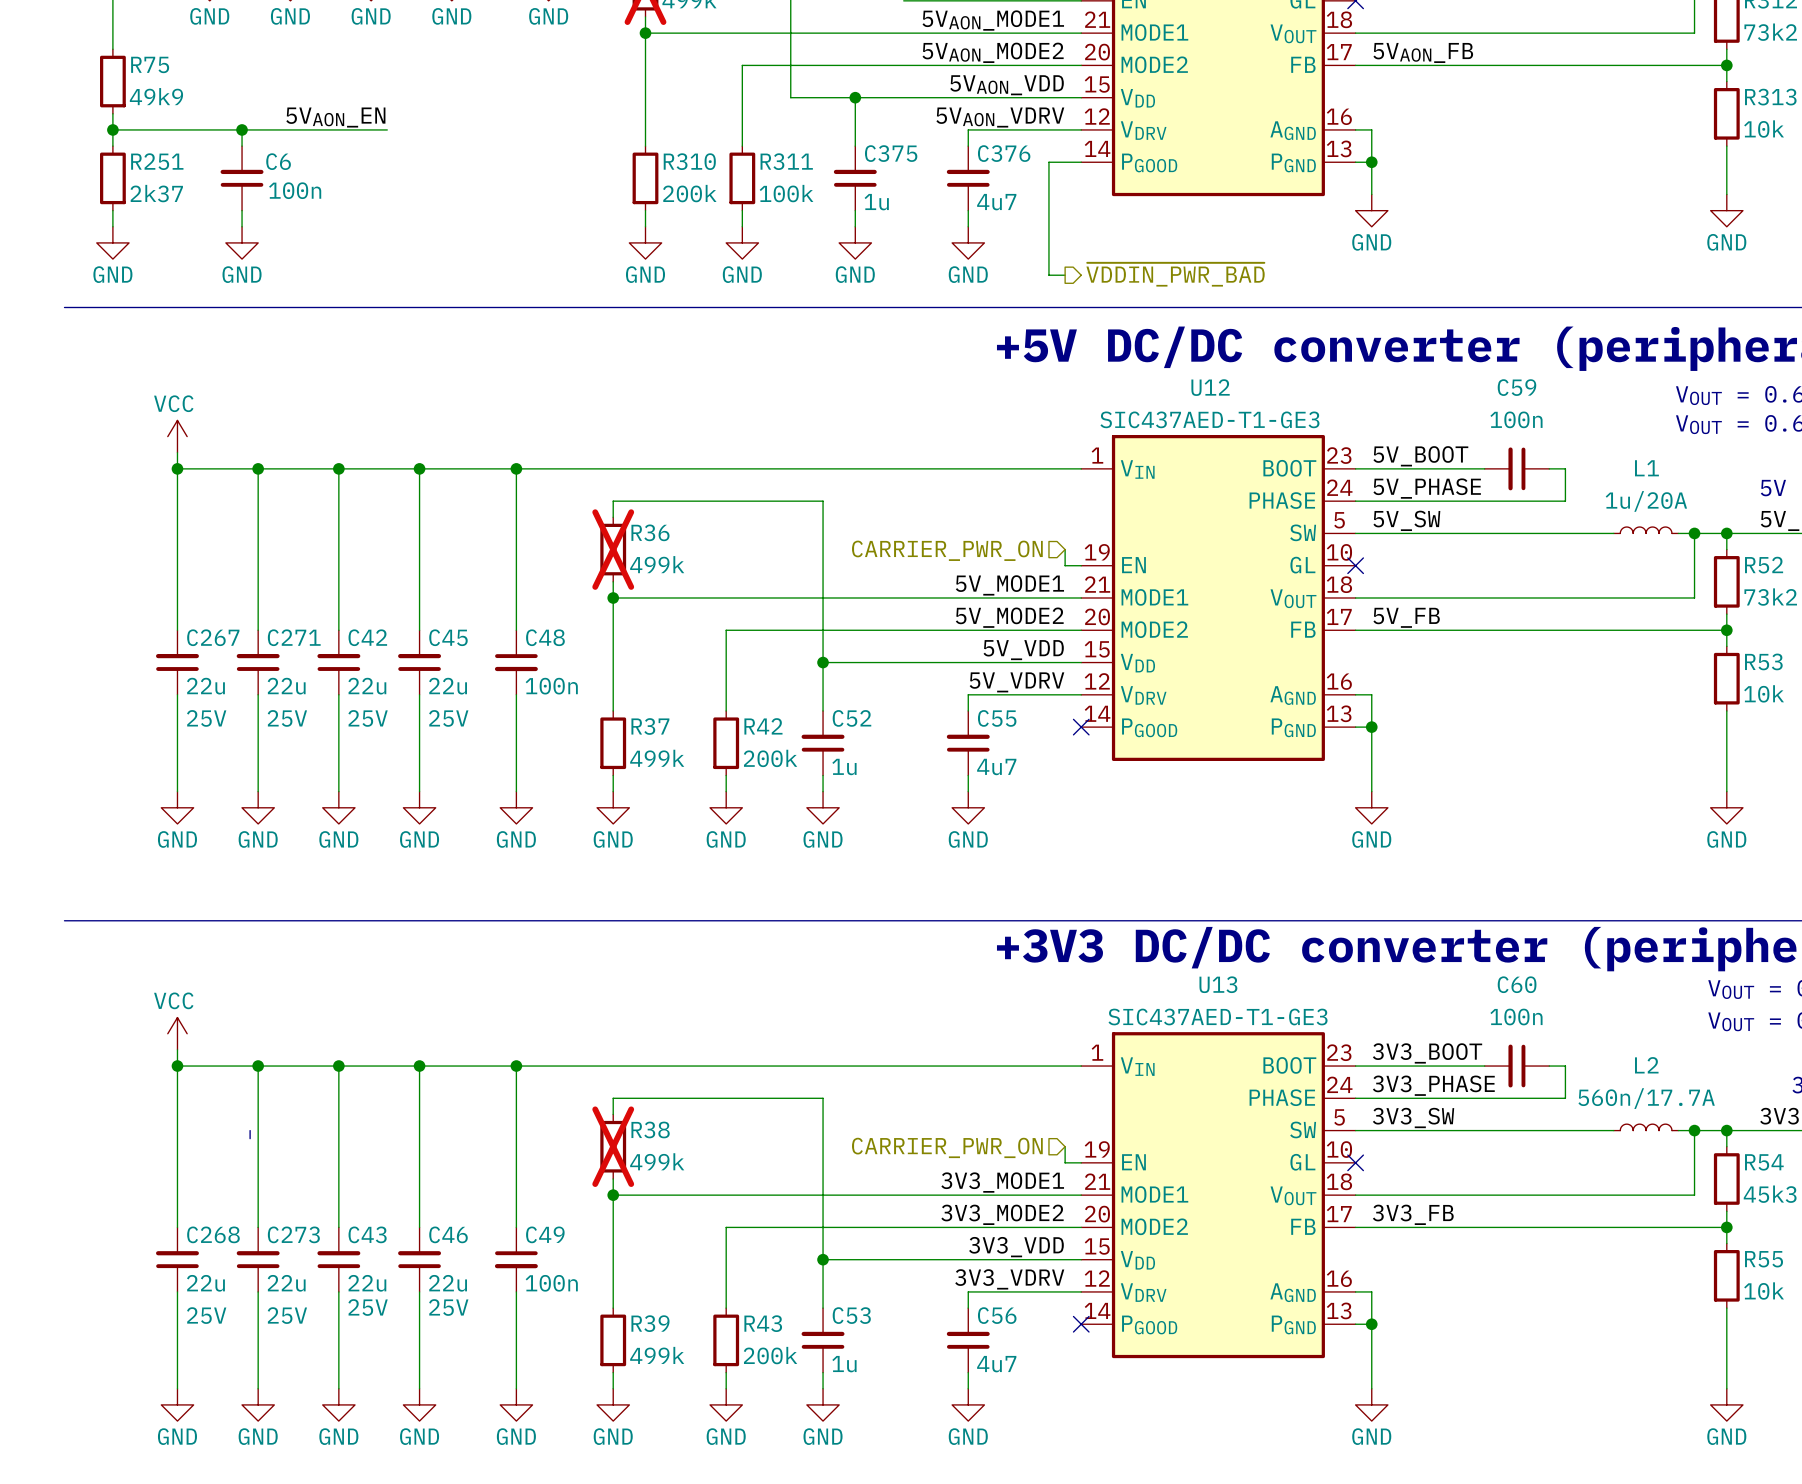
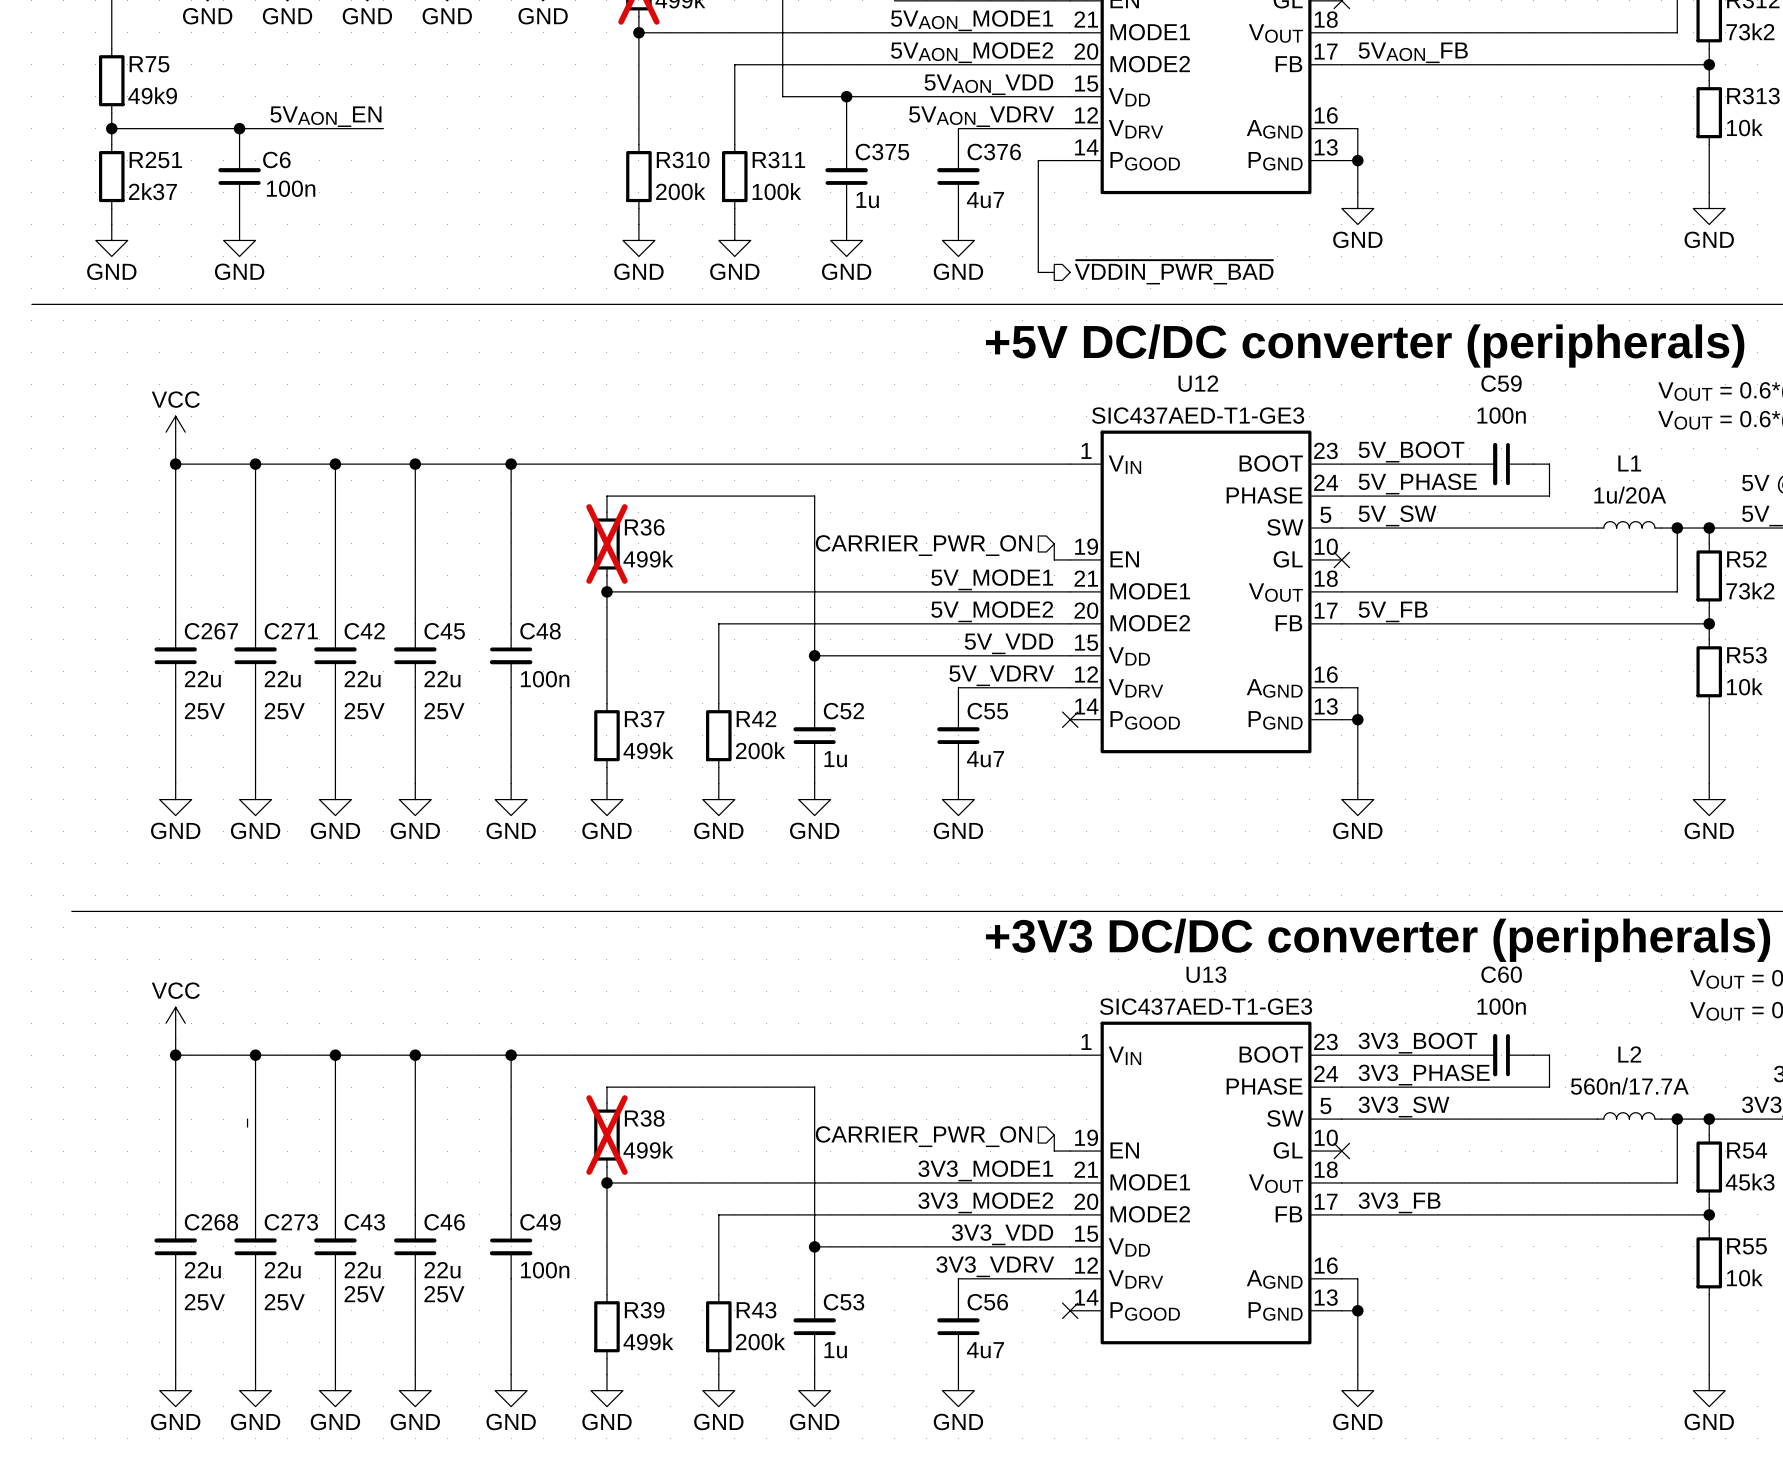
line: none -> (31, 304) (63, 304)
line: (64, 920) (72, 920) -> none

